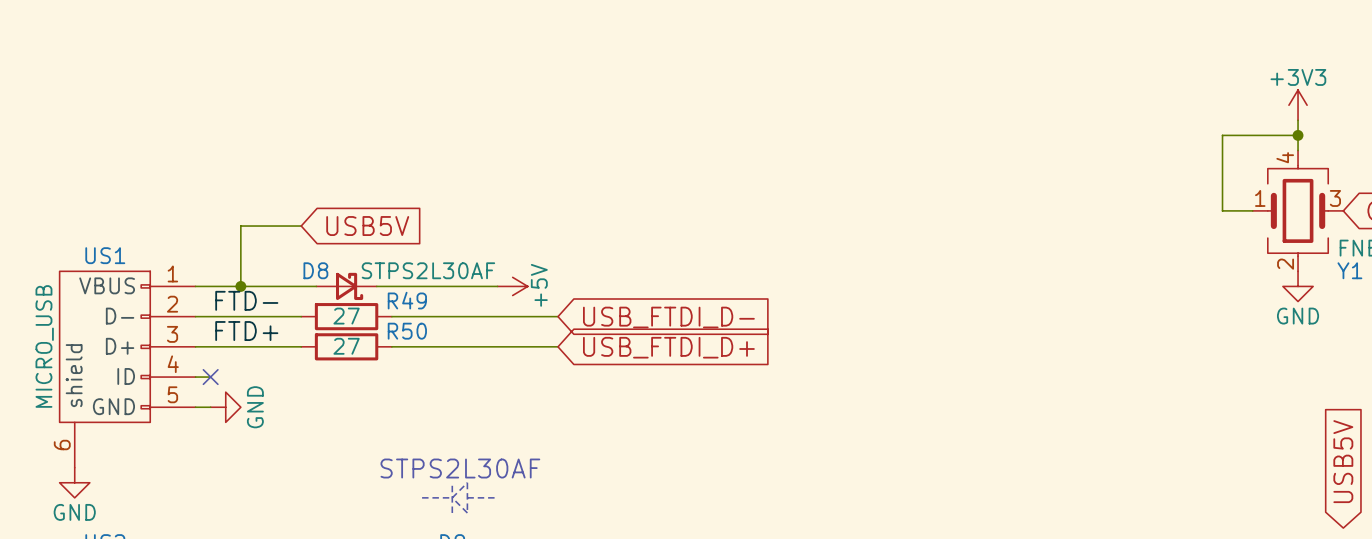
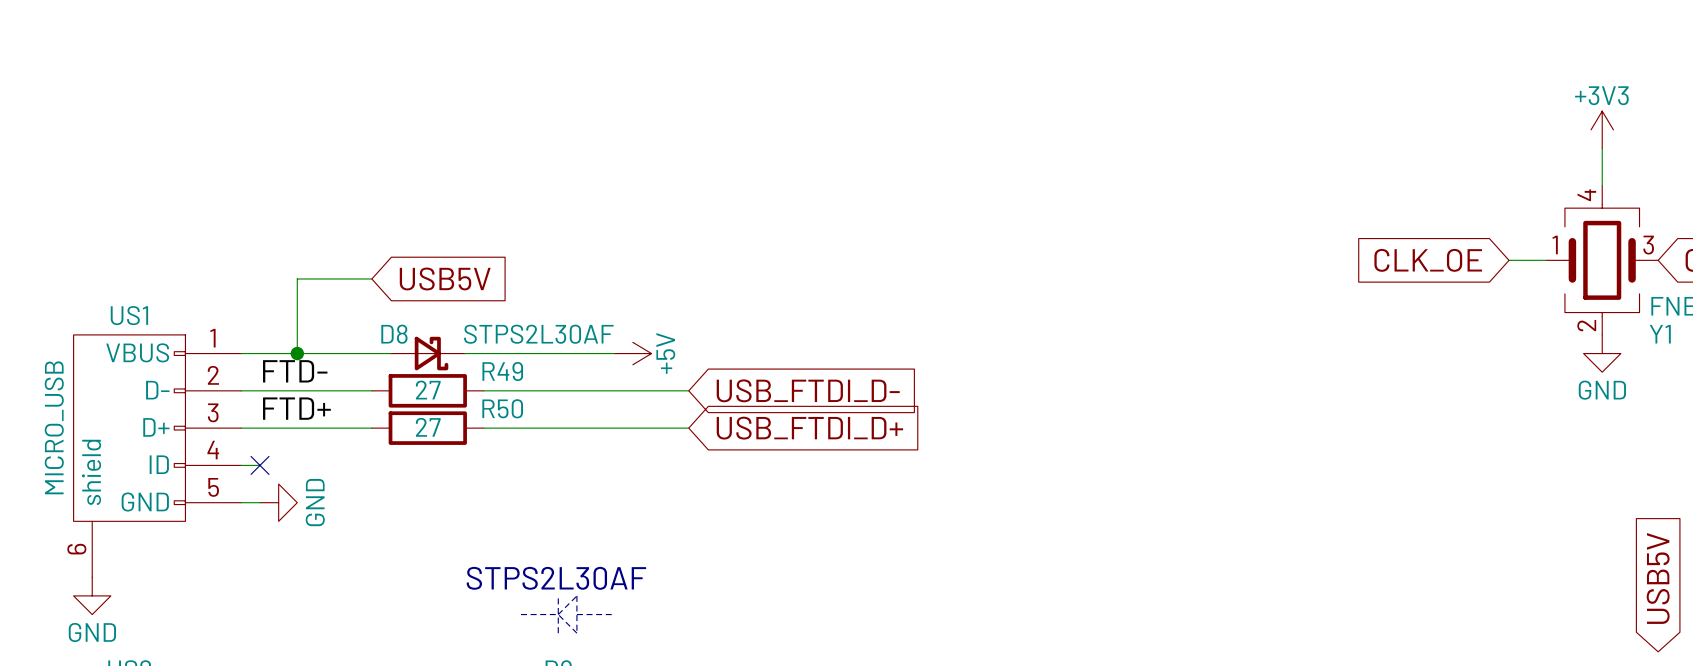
wire: (1298, 135) (1222, 135) (1222, 210) -> none
junction: (1298, 135) -> none
global label: none -> CLK_OE (1428, 260)

